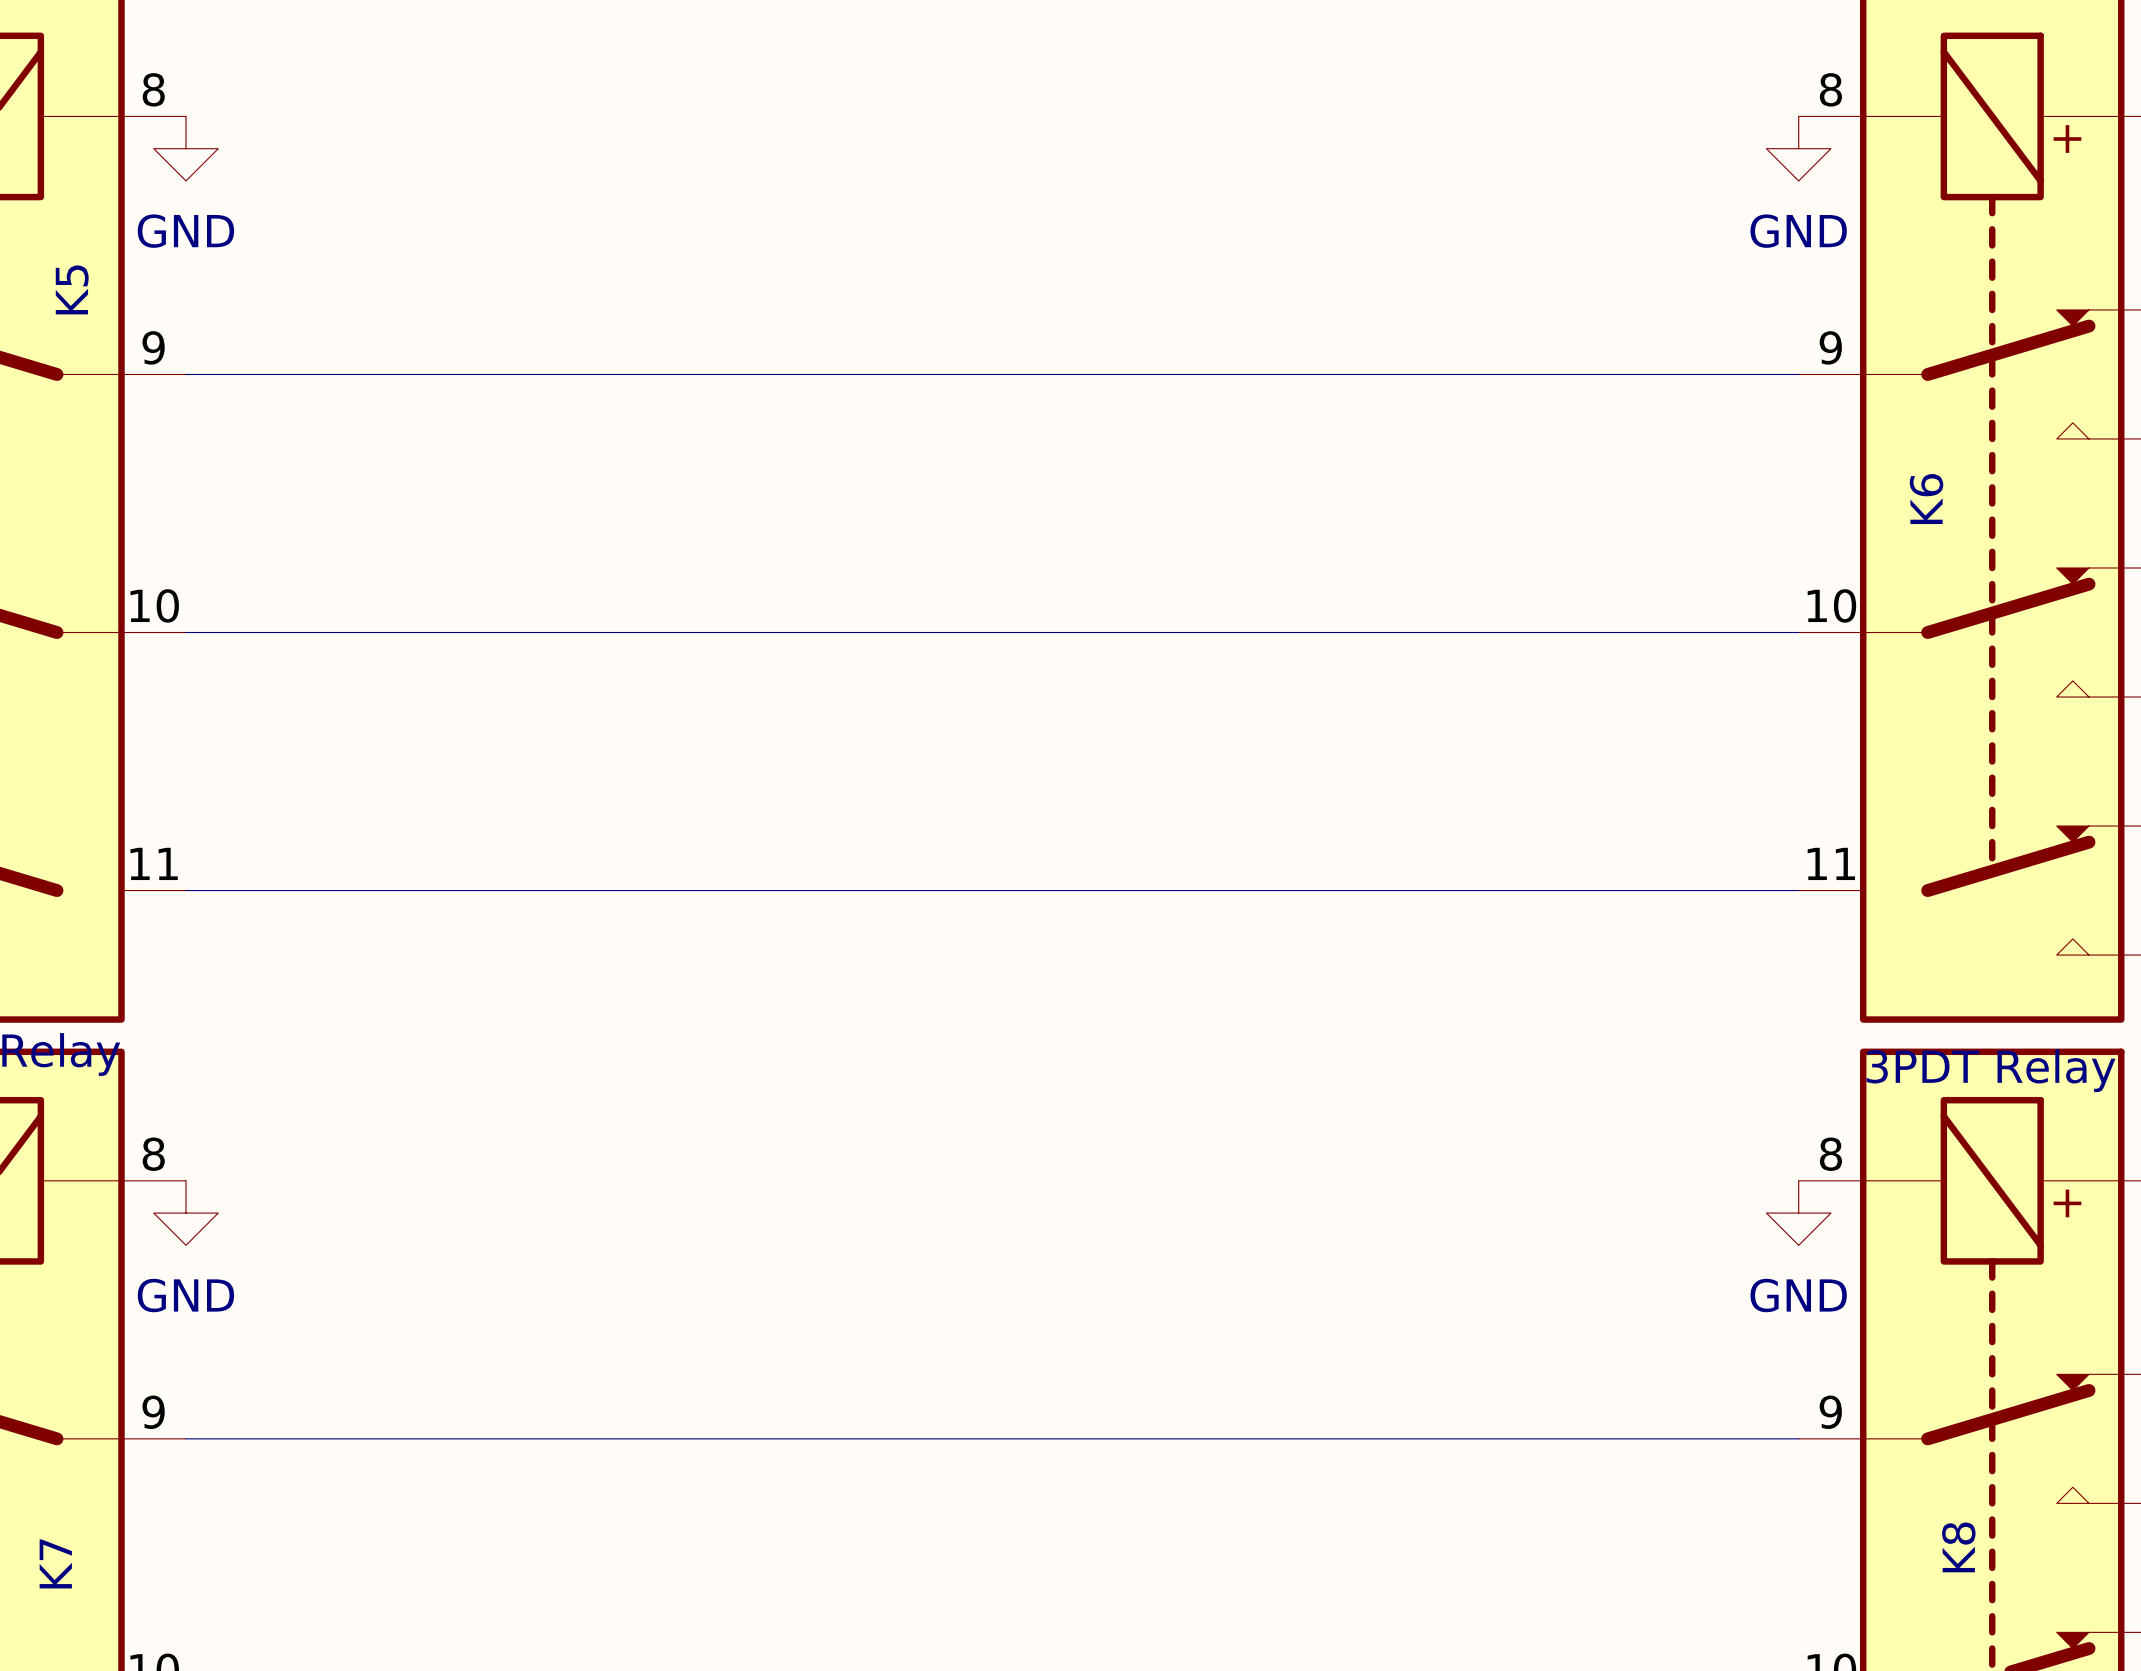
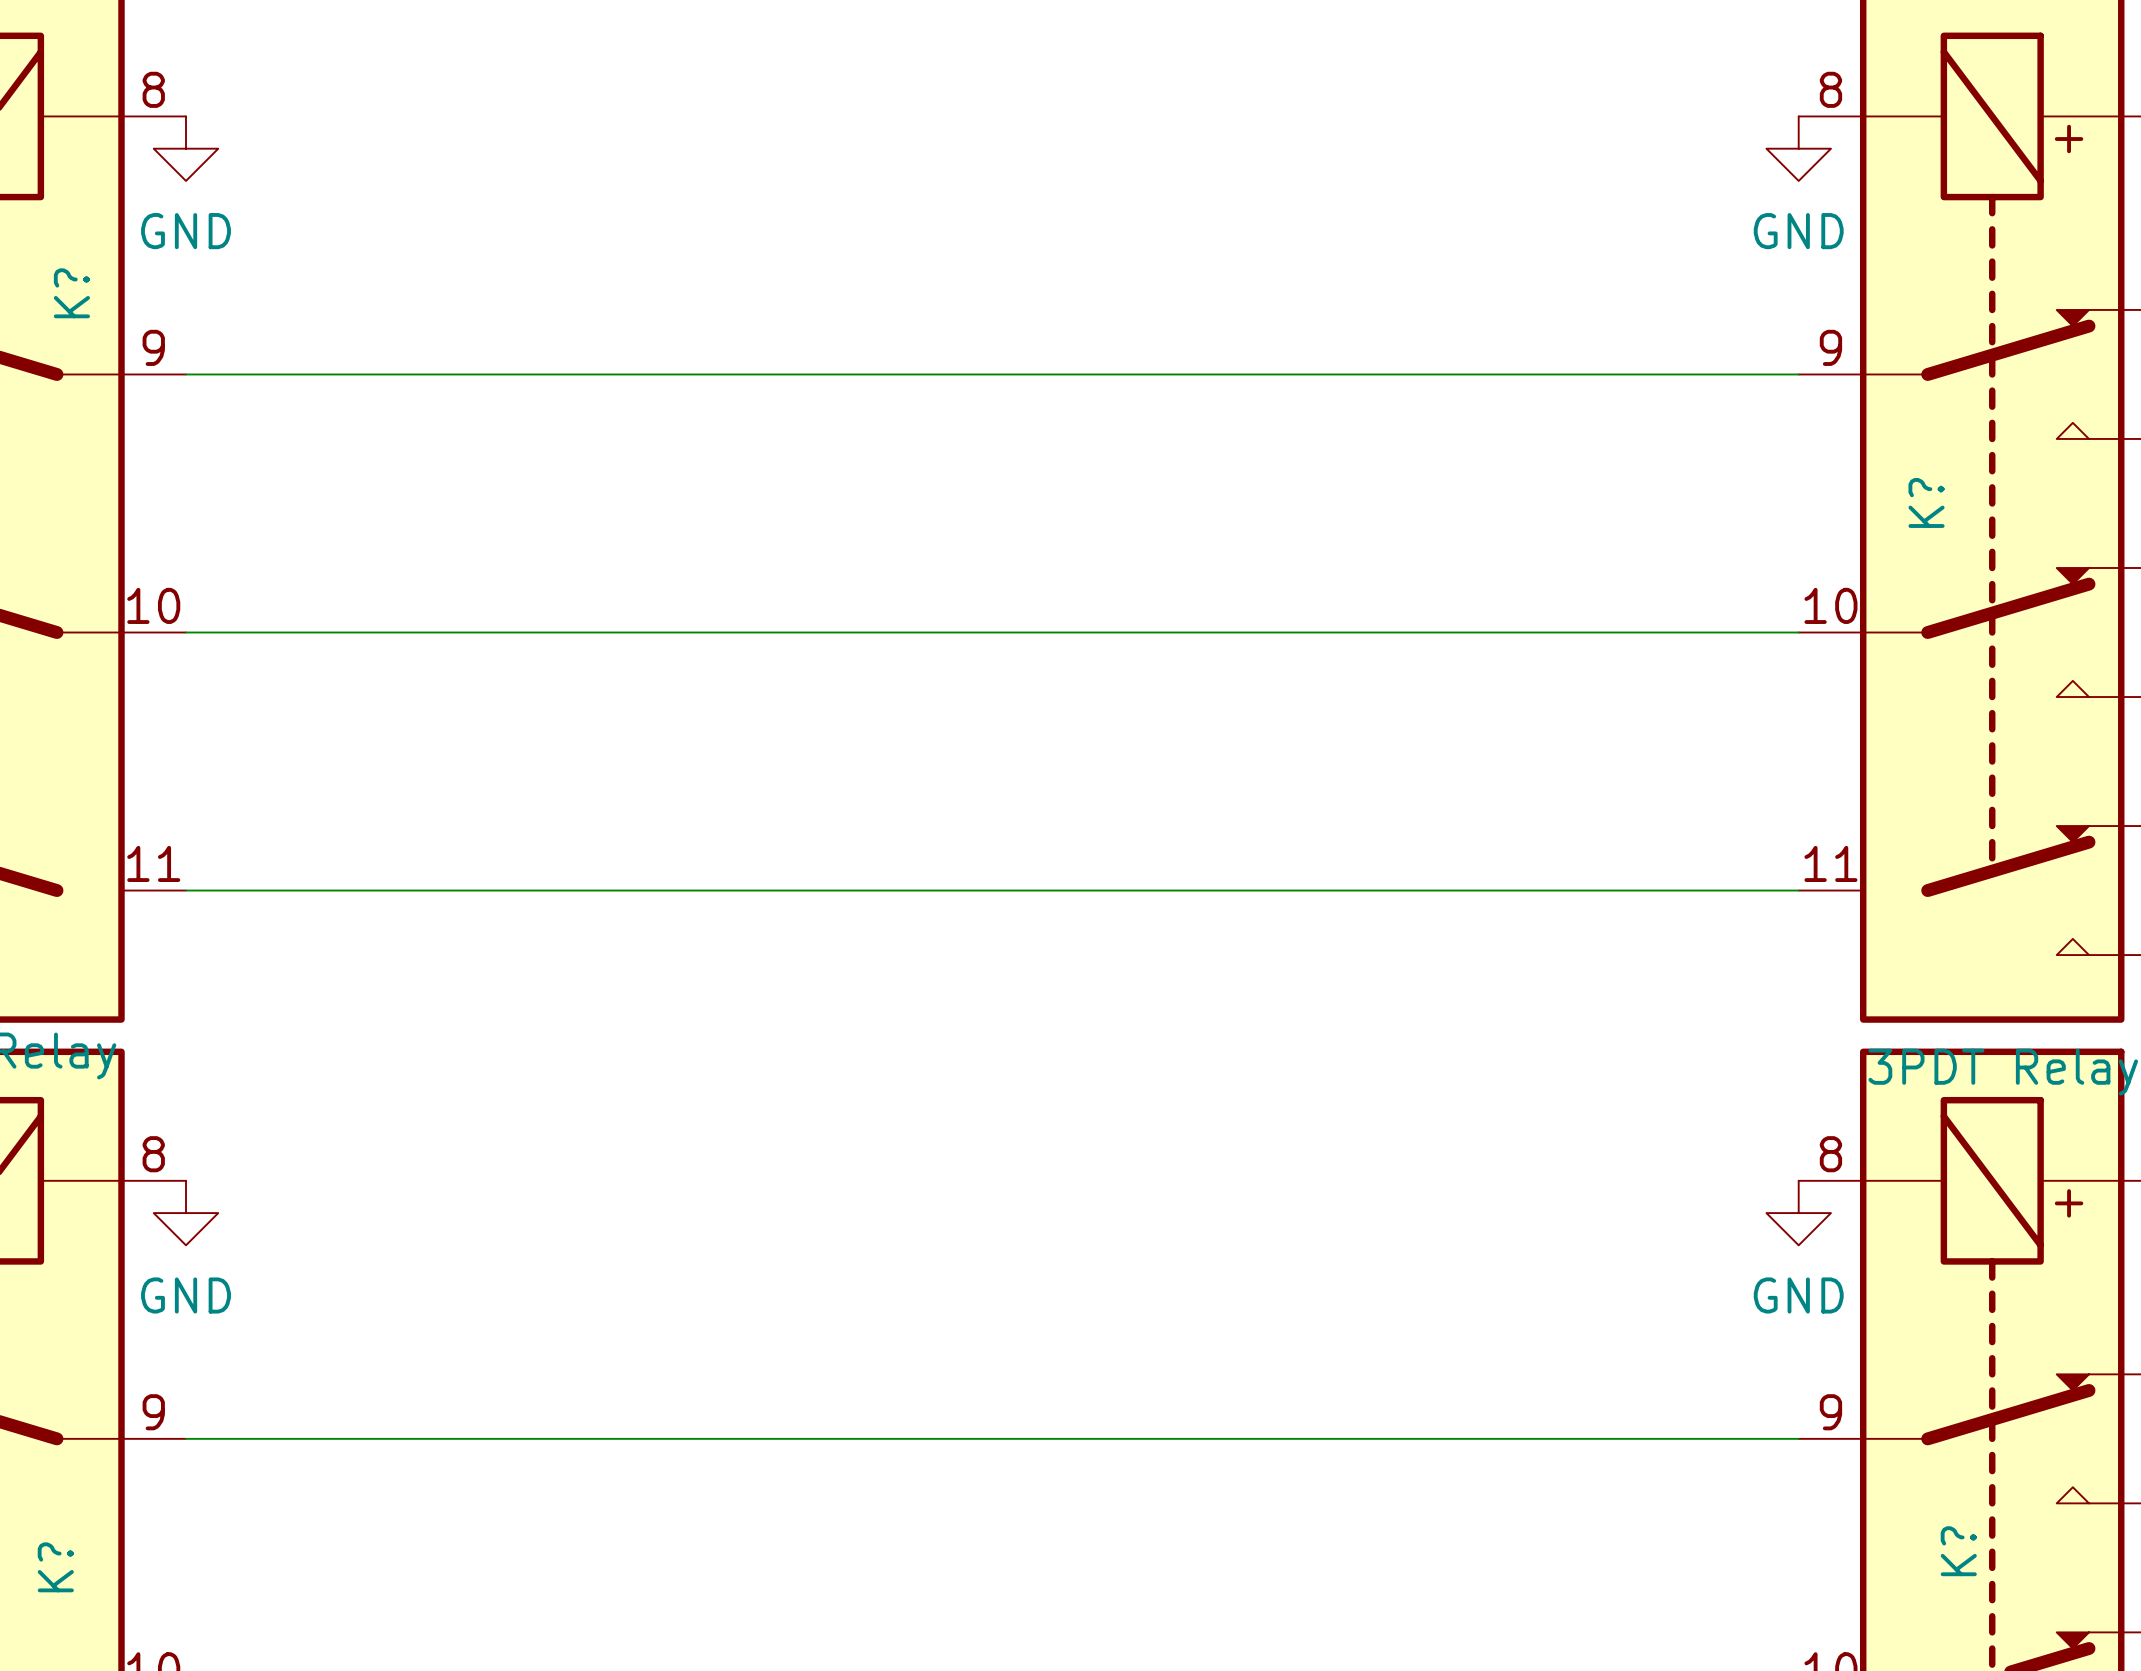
K5 name: K5 (72, 289) -> K? (71, 293)
K6 name: K6 (1926, 499) -> K? (1926, 502)
K8 name: K8 (1958, 1547) -> K? (1958, 1551)
K7 name: K7 (55, 1563) -> K? (55, 1567)

